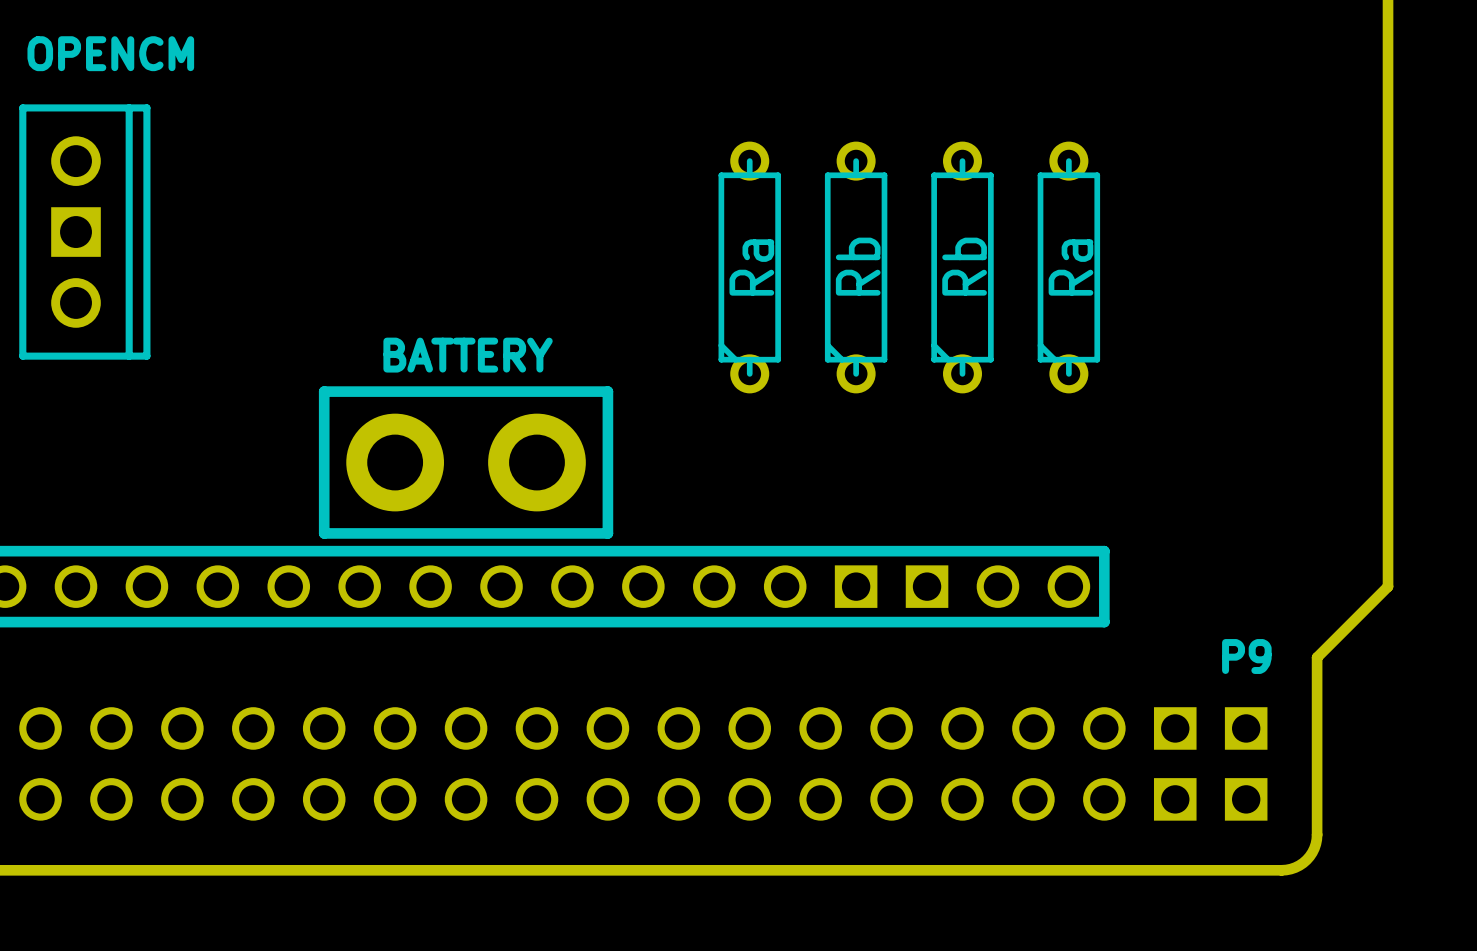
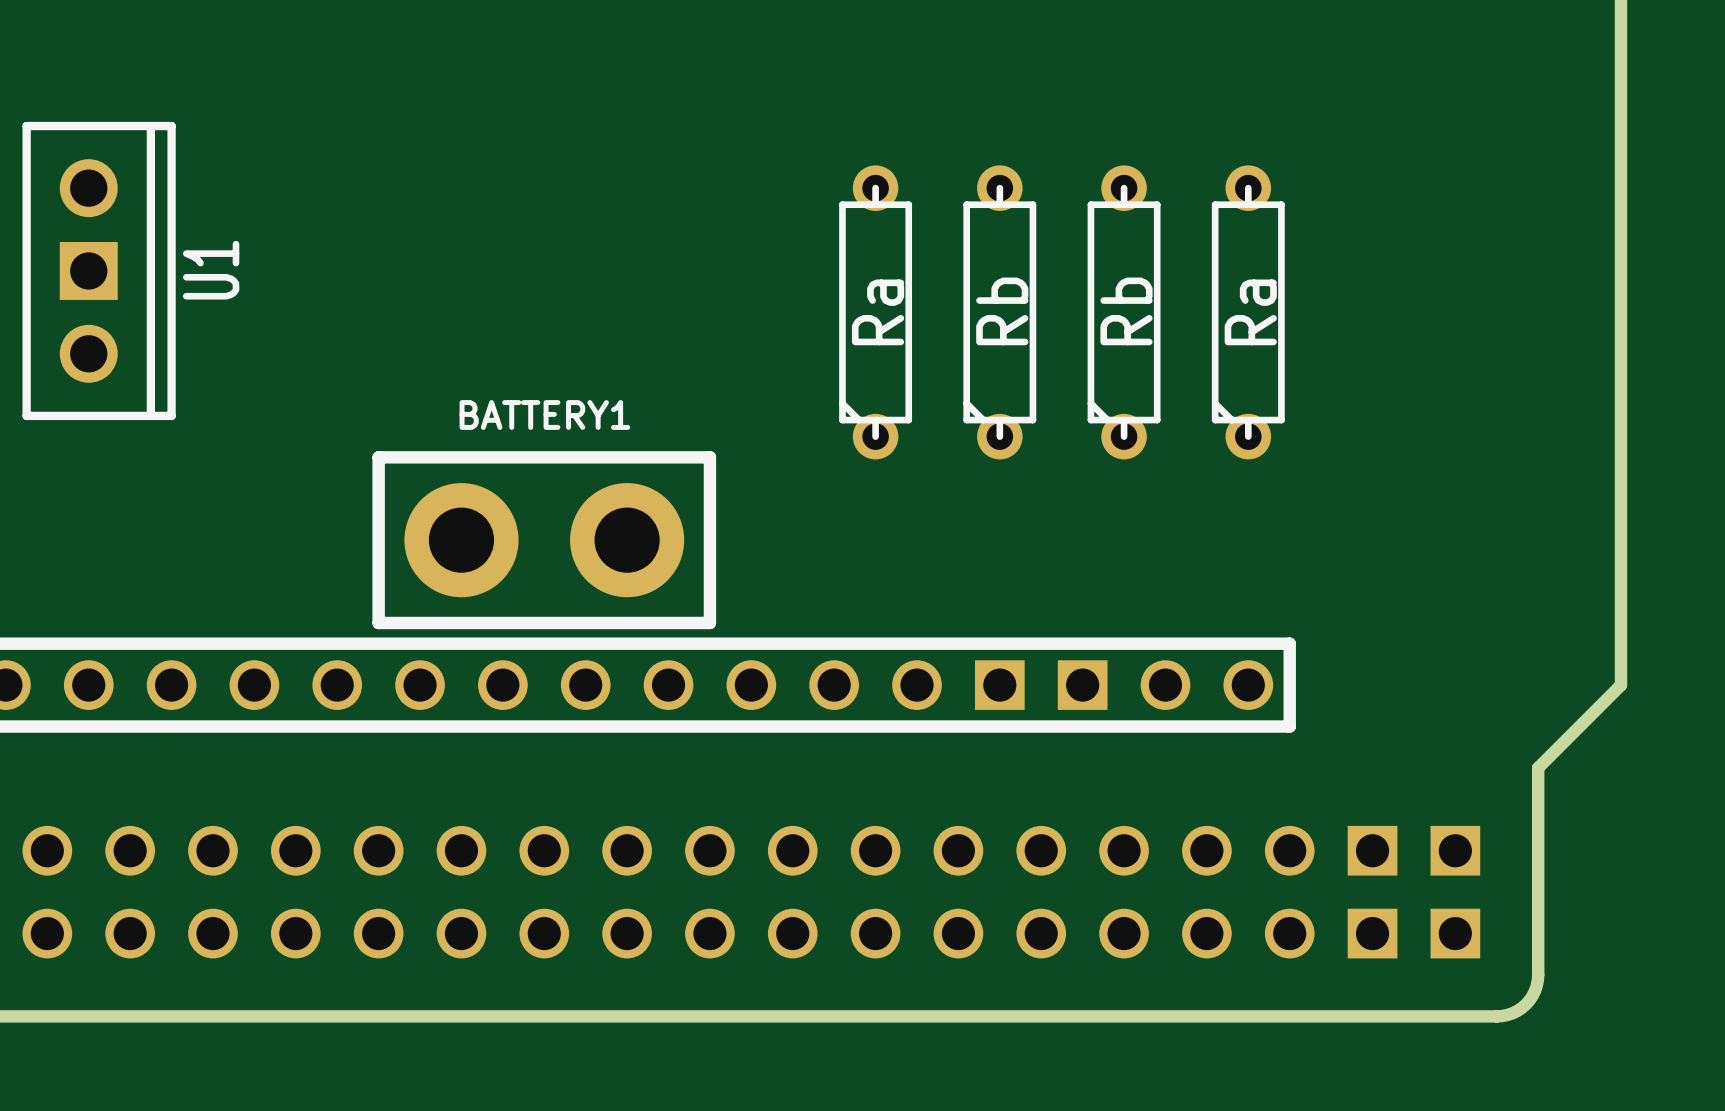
text: OPENCM (110, 53) -> none
U1 name: none -> U1 (211, 270)
BATTERY1 name: none -> BATTERY1 (544, 414)
text: BATTERY (468, 355) -> none
text: P9 (1246, 656) -> none

